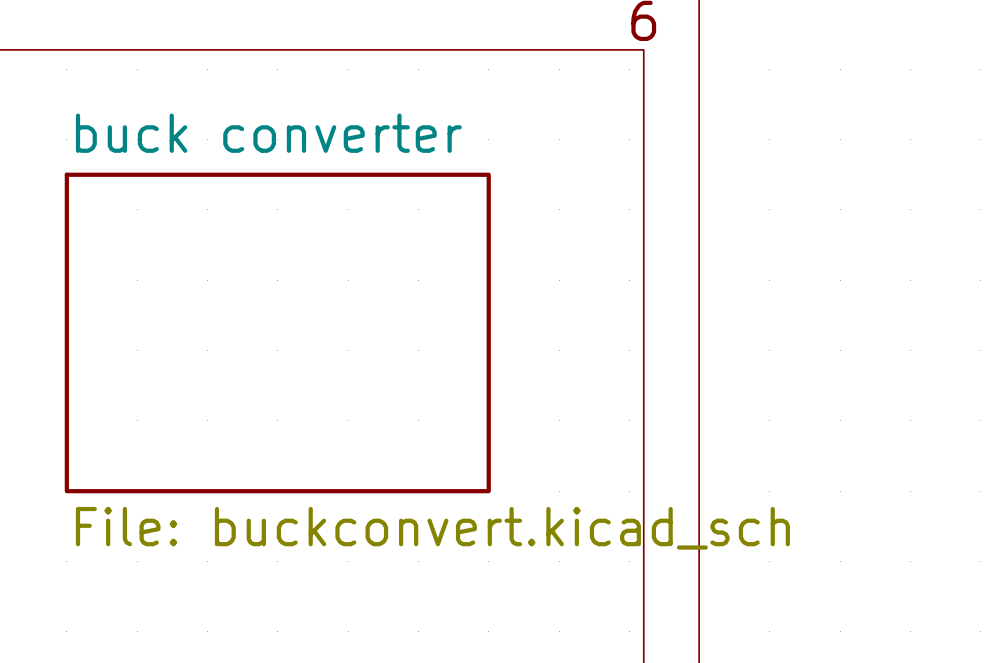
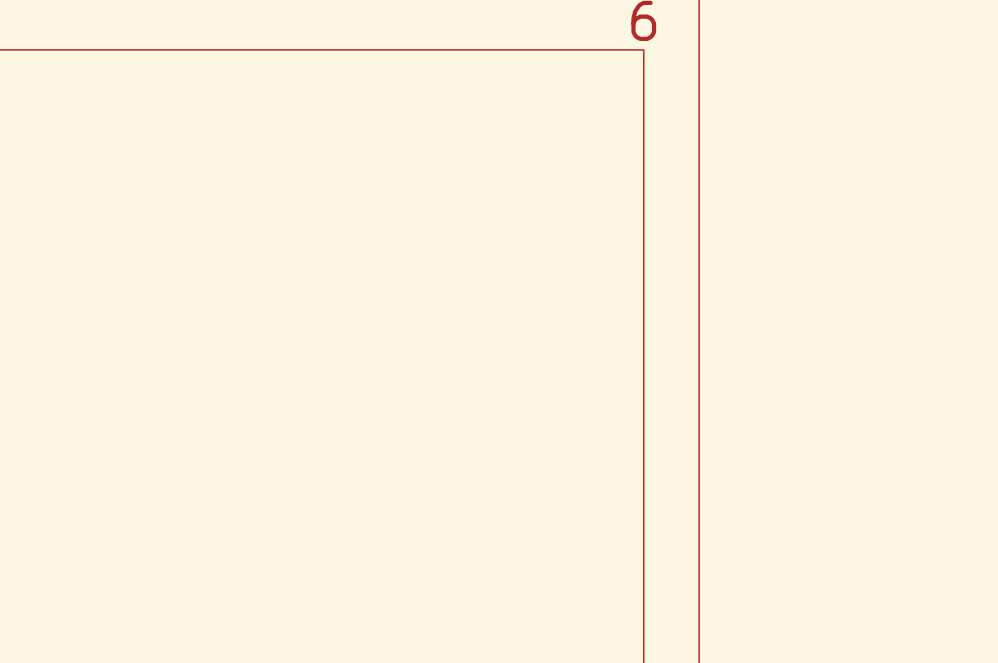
sheet buck converter: File: buckconvert.kicad_sch (277, 332) -> none

